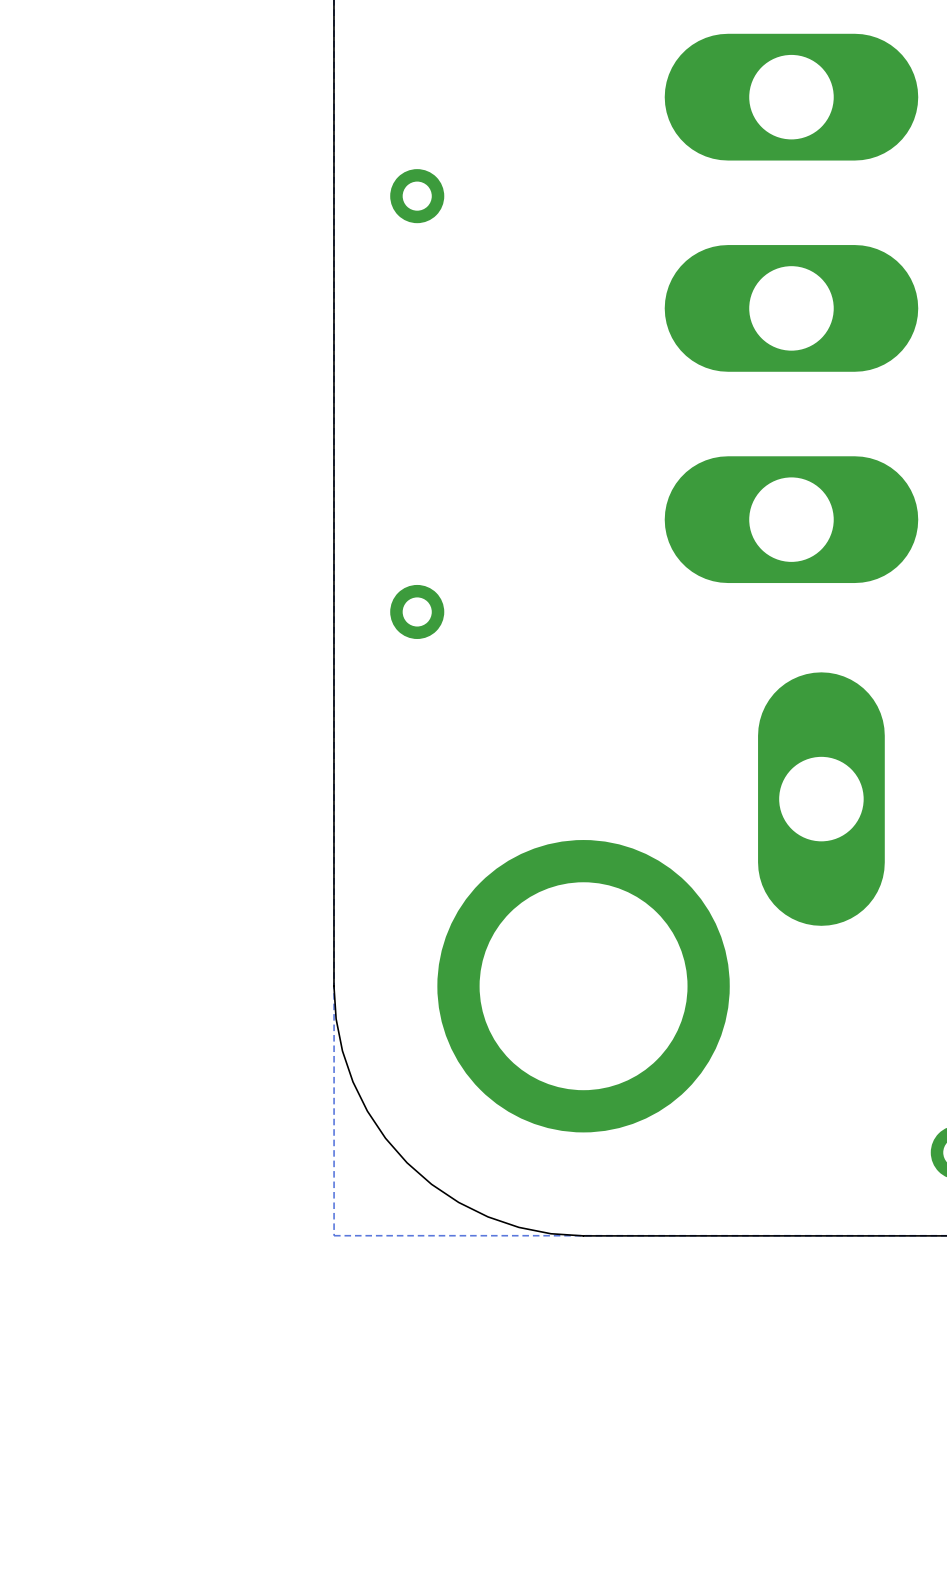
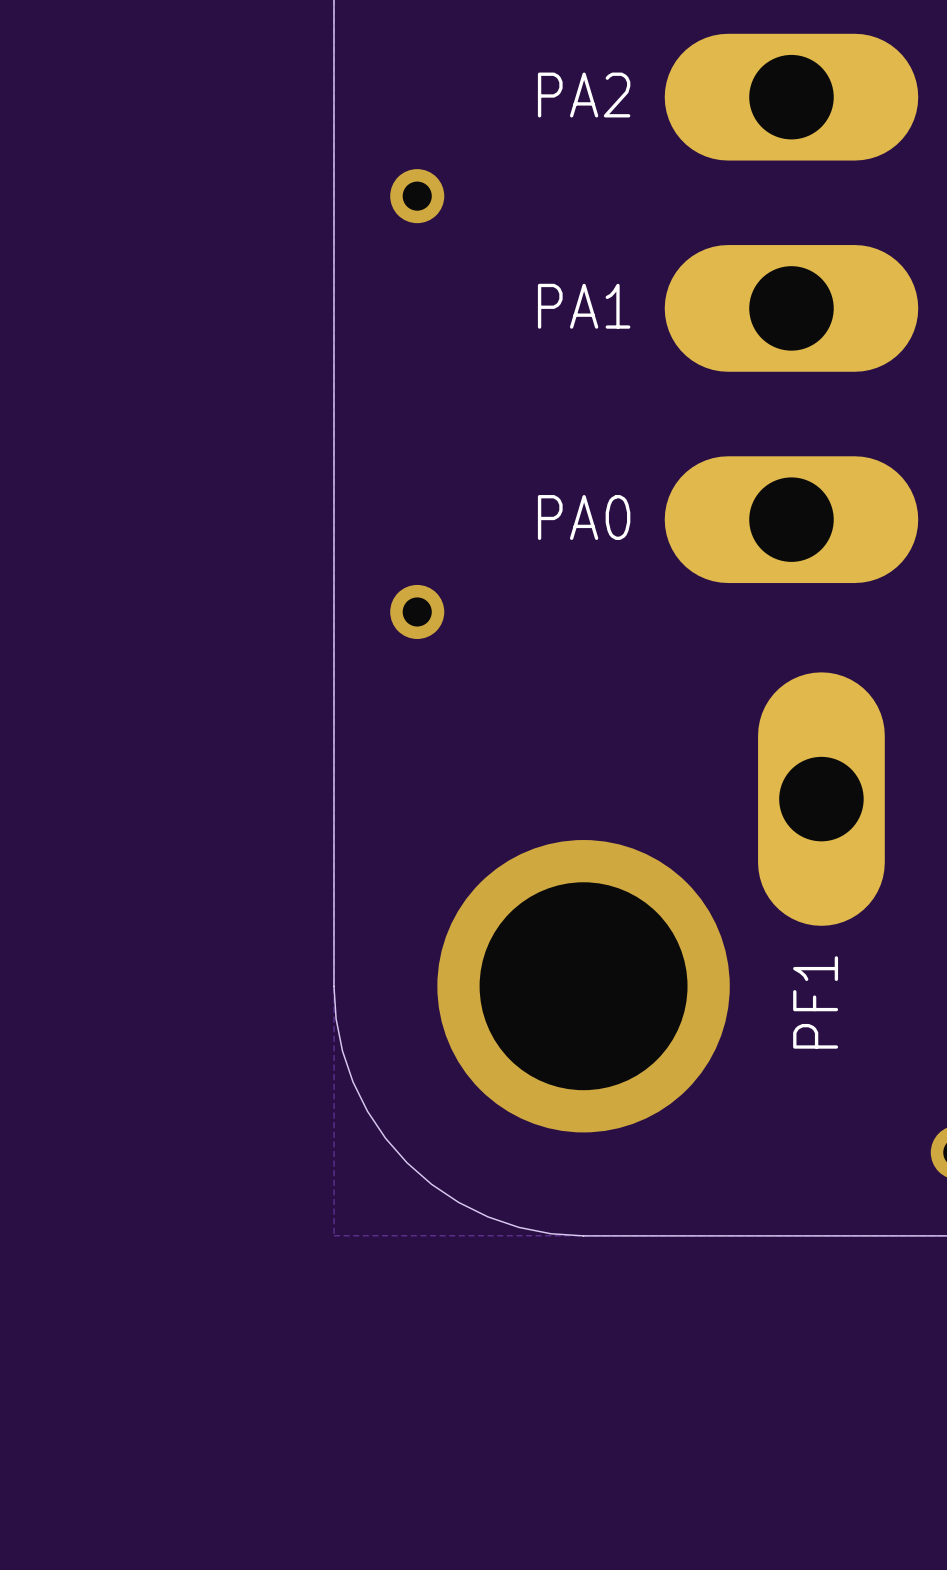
text: none -> PA2 (584, 95)
text: none -> PA1 (584, 306)
text: none -> PA0 (584, 517)
text: none -> PF1 (815, 1002)

